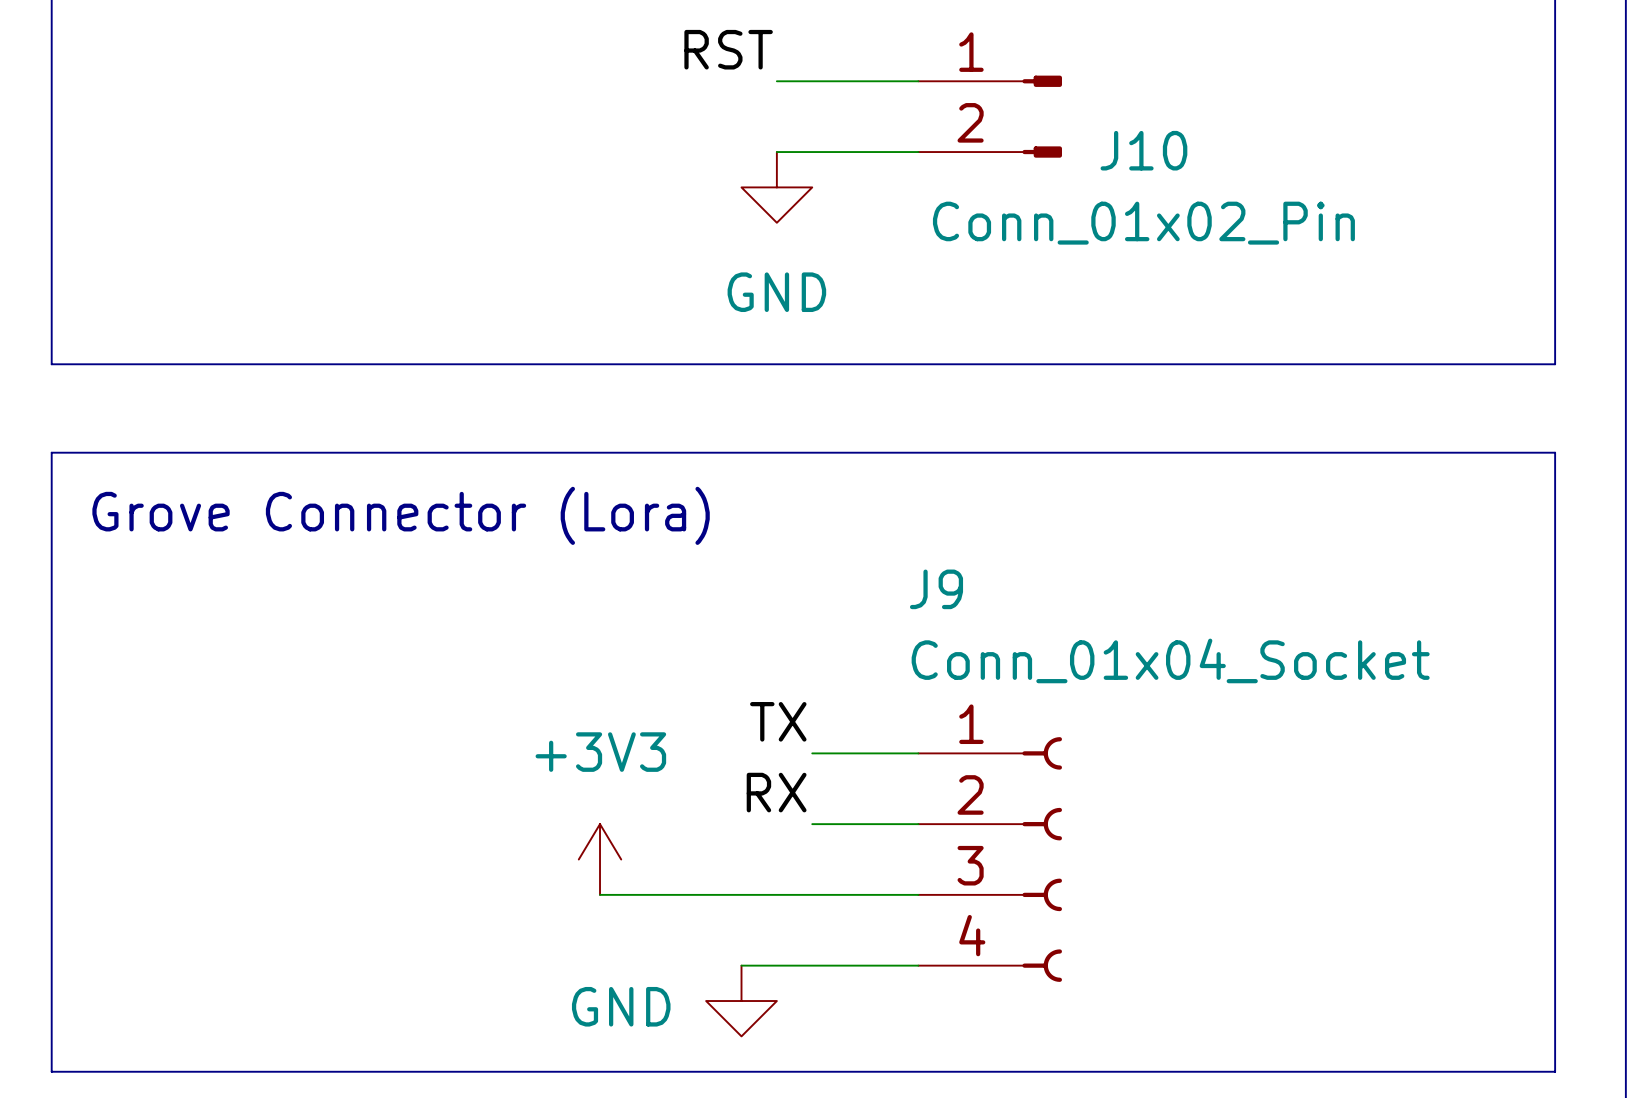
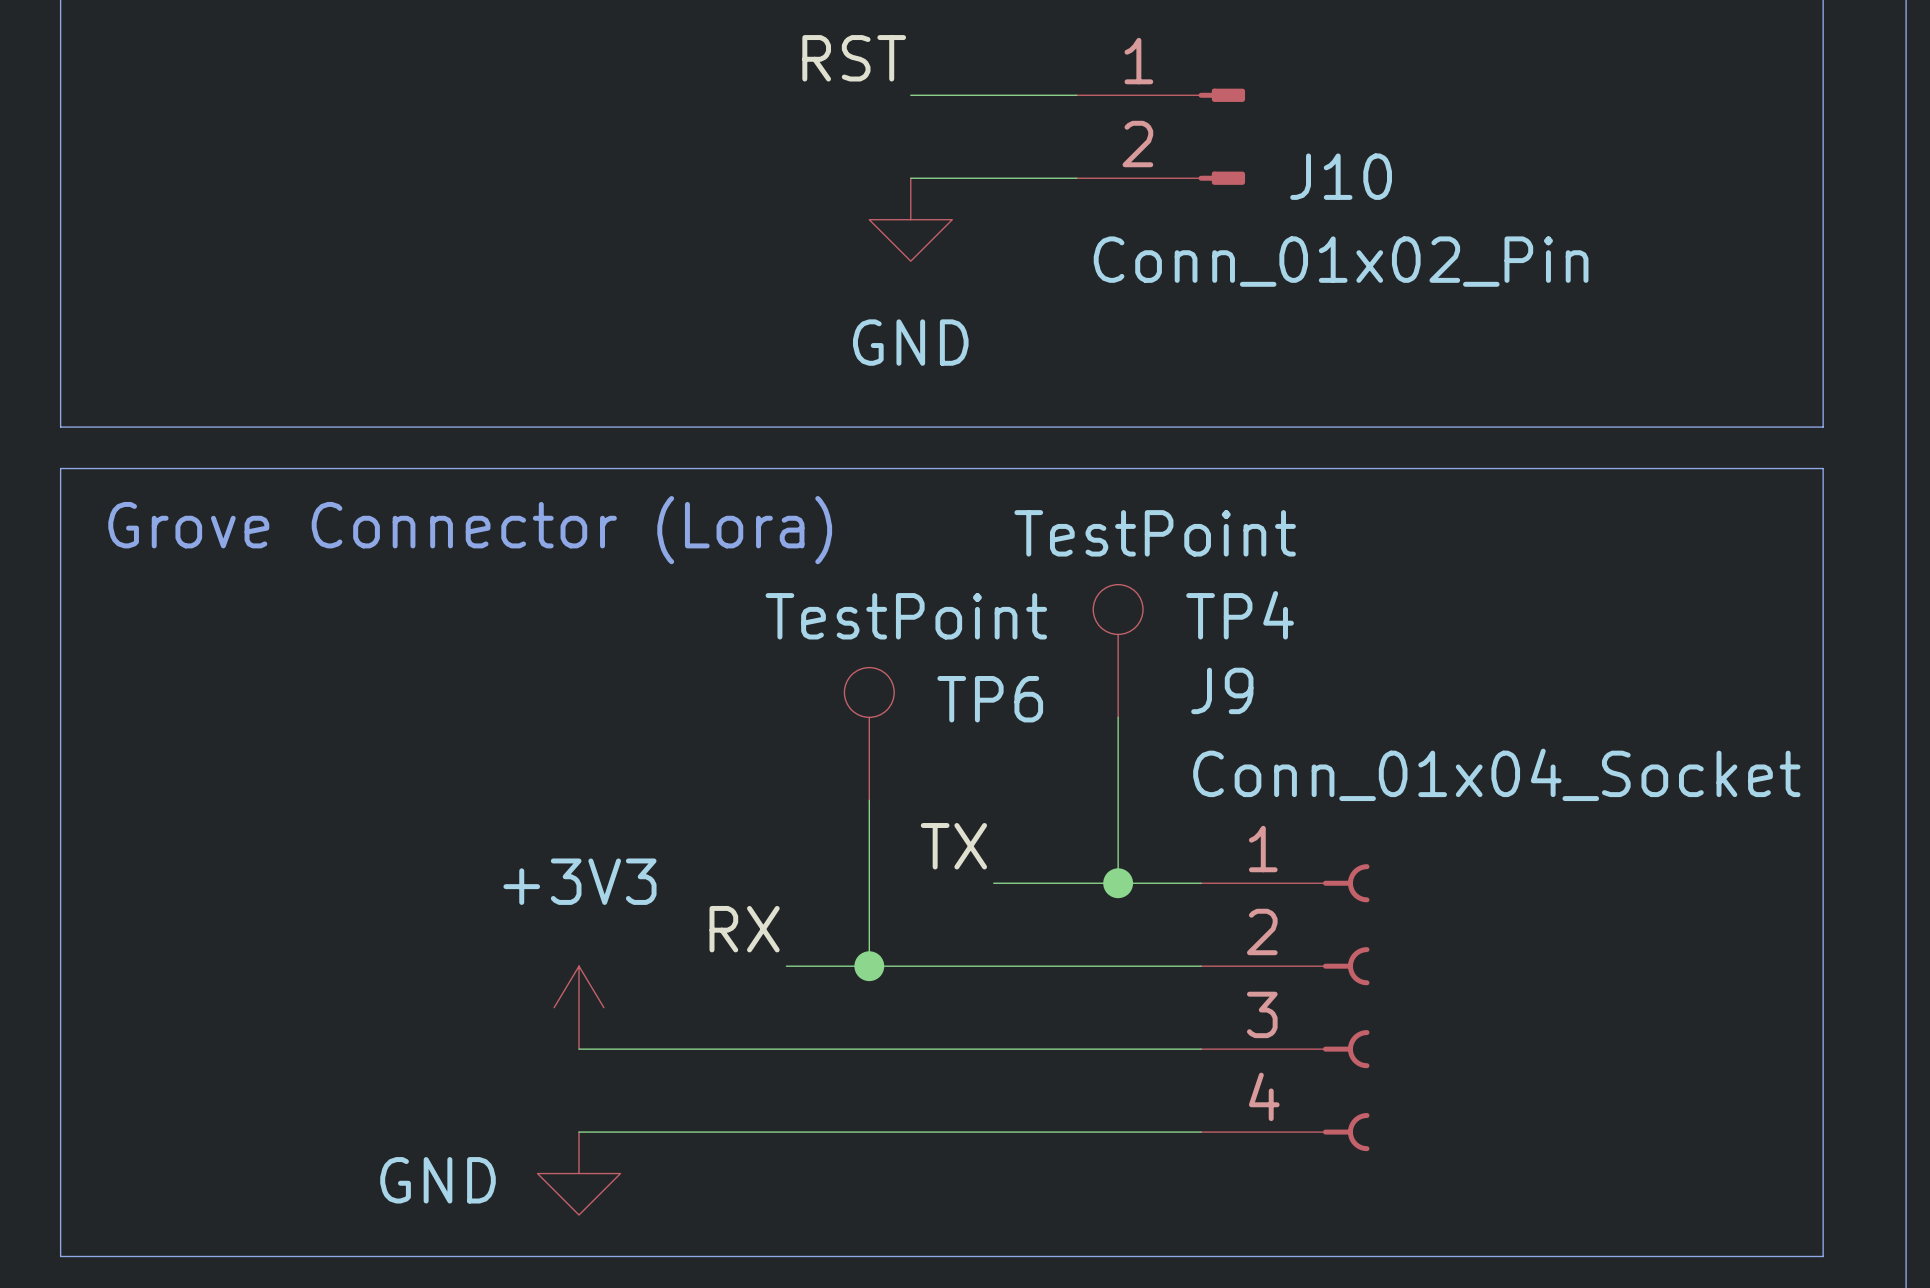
line: (51, 452) (1555, 452) -> (60, 530) (60, 468) (1823, 468) (1823, 530)
text position: Grove Connector (Lora) (401, 515) -> Grove Connector (Lora) (470, 530)
TP4: none -> TestPoint (1118, 651)
wire: none -> (1118, 717) (1118, 883)
TP6: none -> TestPoint (869, 733)
wire: none -> (869, 800) (869, 966)
label position: TX (778, 721) -> TX (953, 846)
wire: (812, 753) (847, 753) -> none
junction: none -> (1118, 883)
label position: RX (776, 792) -> RX (744, 929)
wire: none -> (786, 966) (952, 966)
junction: none -> (869, 966)
power symbol position: +3V3 (600, 859) -> +3V3 (579, 1007)
J9 position: (990, 859) -> (1285, 1007)
wire: none -> (579, 1049) (703, 1049)
wire: none -> (579, 1132) (869, 1132)
power symbol position: GND (741, 1001) -> GND (579, 1173)

